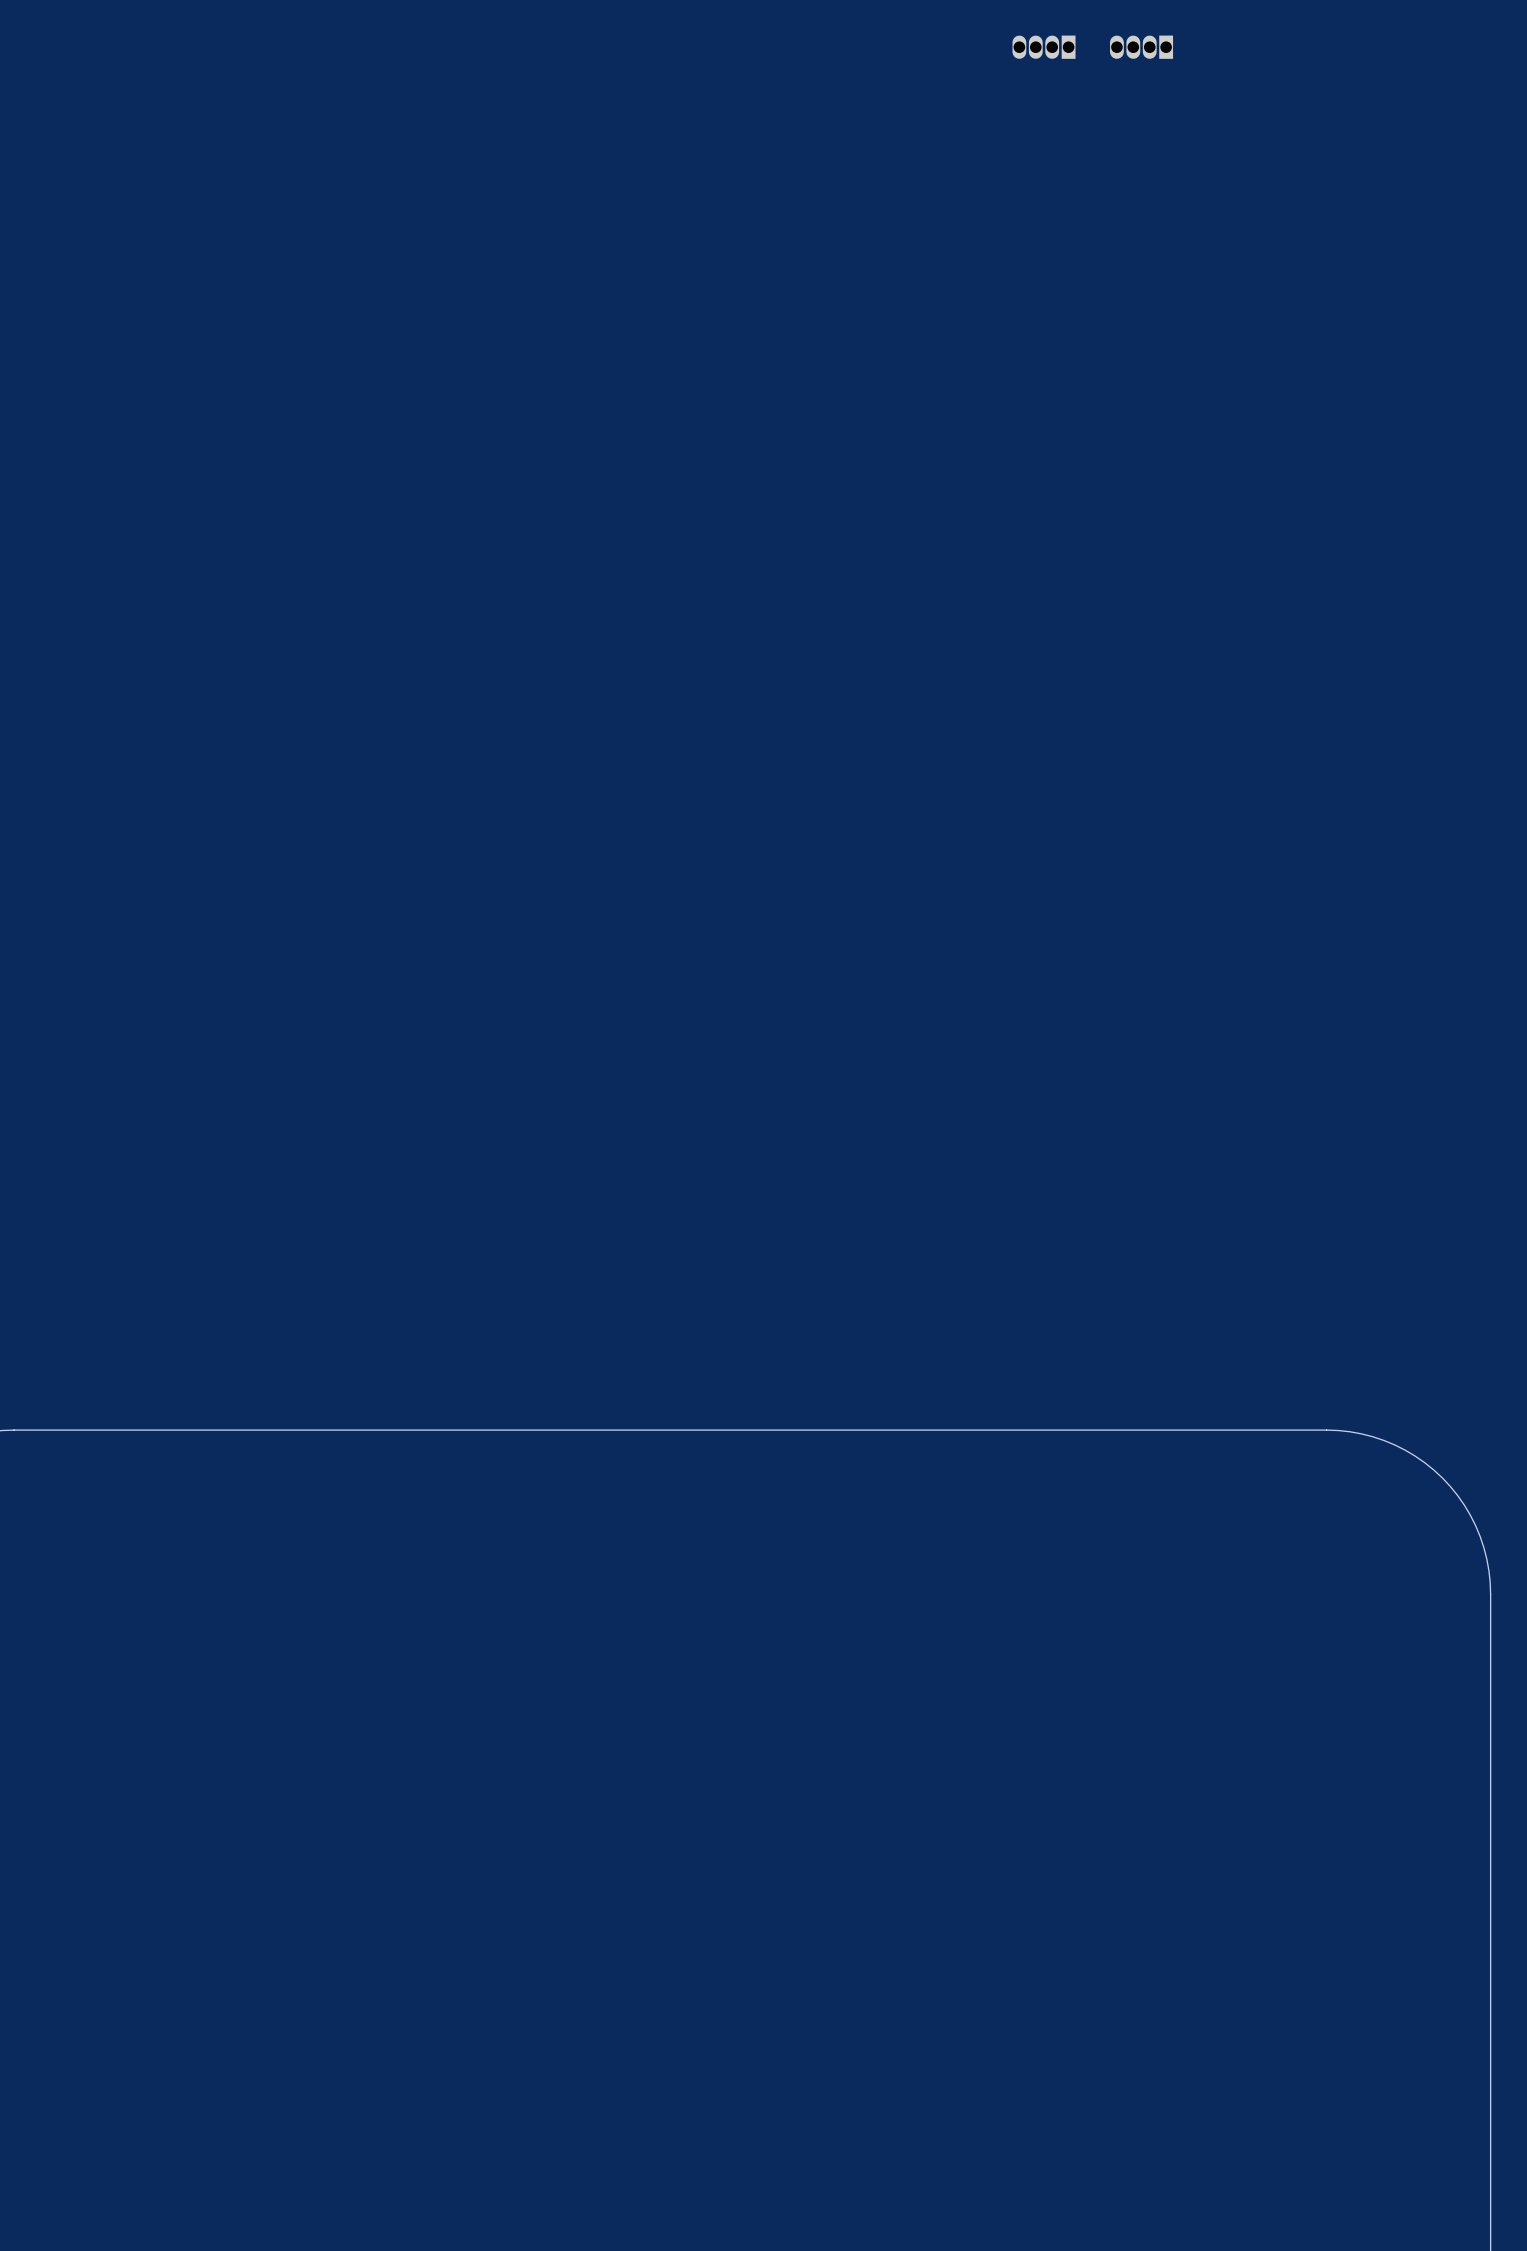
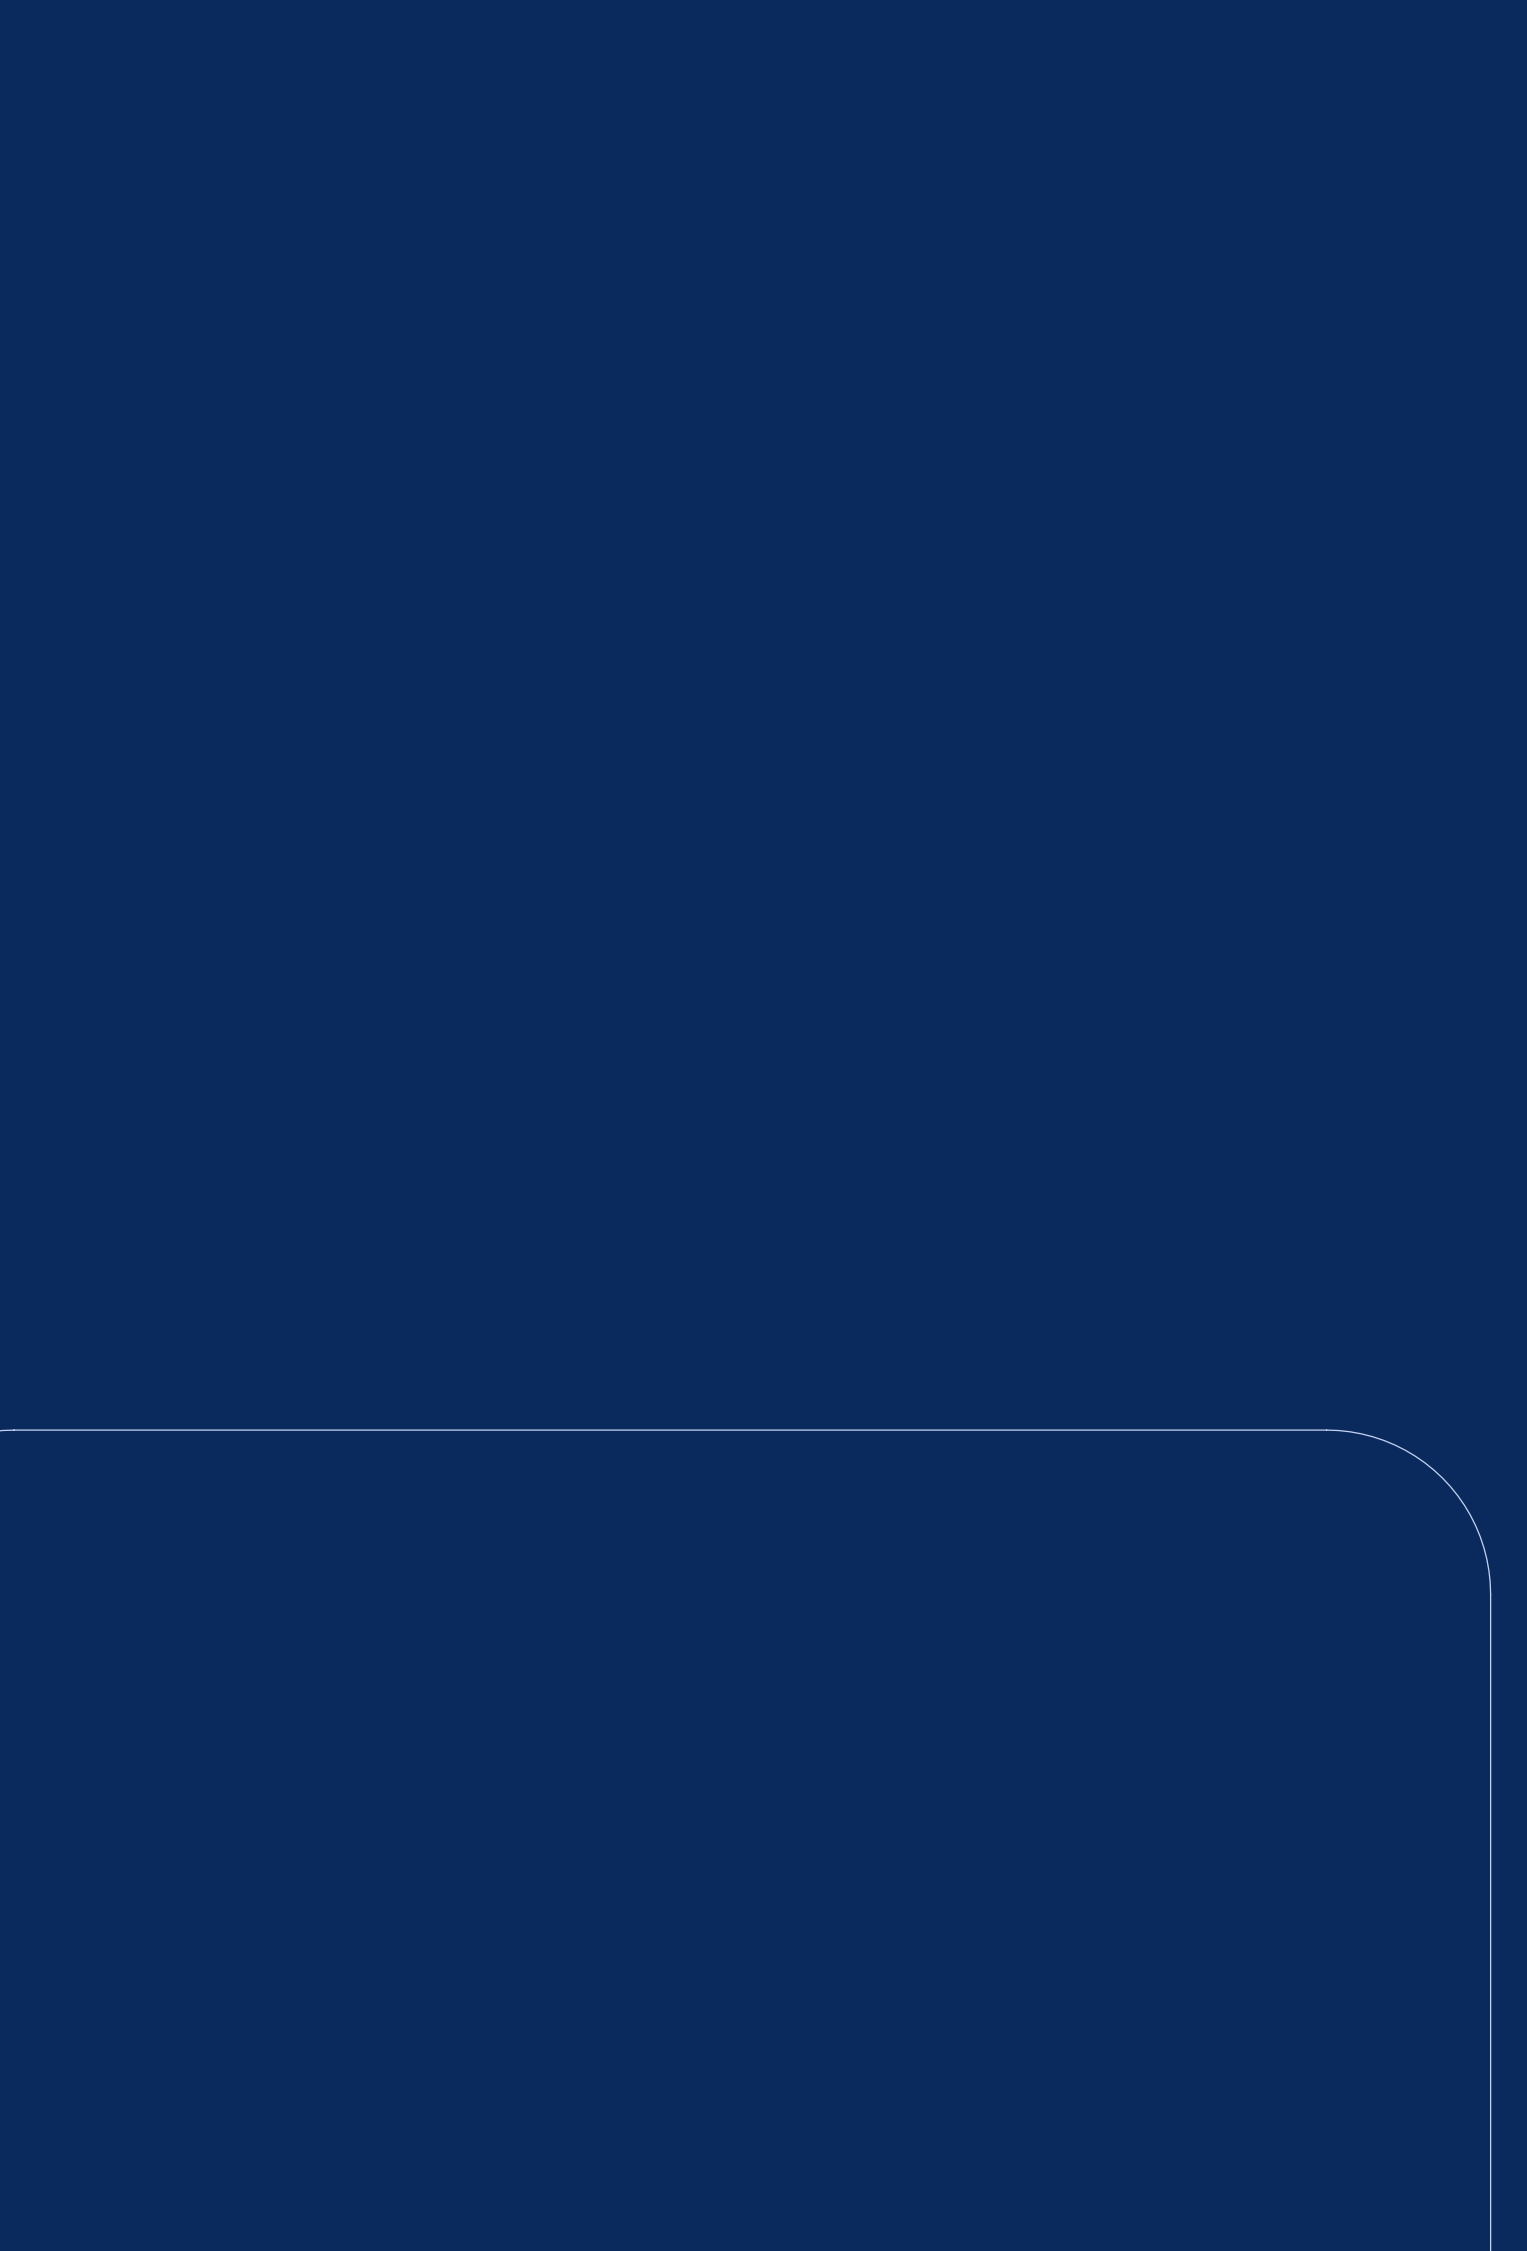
part: (1043, 47) -> none
part: (1141, 47) -> none

